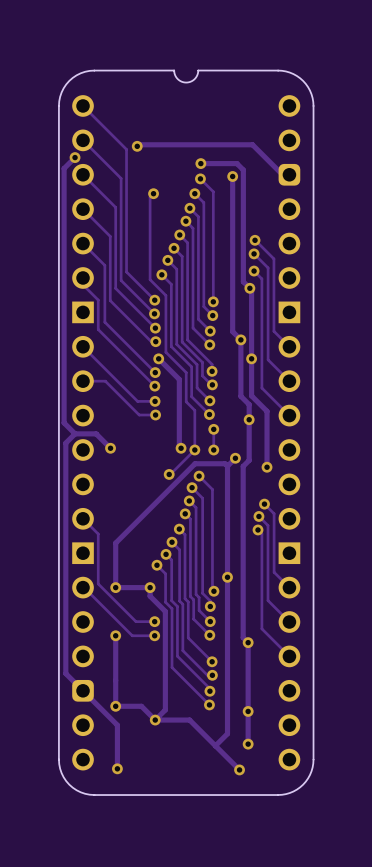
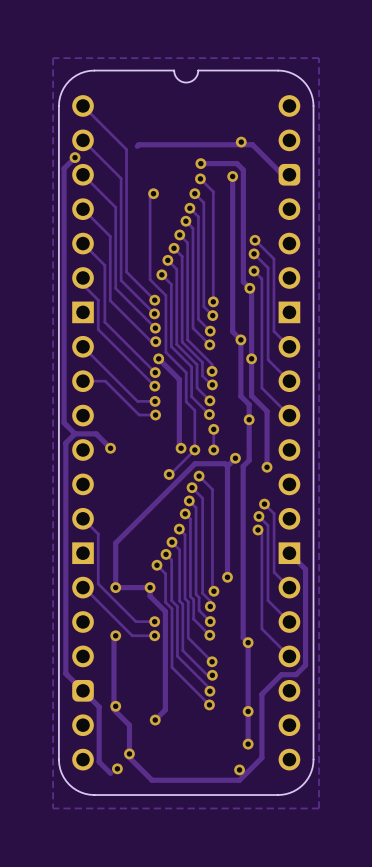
zone outline: none -> (319, 58) (319, 808) (53, 808) (53, 58) (319, 58)
via: none -> (241, 142)
via: (137, 146) -> none
track: none -> (289, 553) (305, 569) (305, 665) (296, 674) (281, 674) (261, 694) (261, 757) (239, 780) (152, 780) (129, 757) (129, 725) (113, 709) (113, 639)
track: (227, 577) (227, 733) (215, 745) -> none
track: (115, 635) (115, 706) (141, 706) (155, 720) (189, 720) (239, 769) -> none
track: (99, 706) (117, 725) (117, 768) -> (99, 706) (99, 761) (110, 773)
via: none -> (129, 753)

